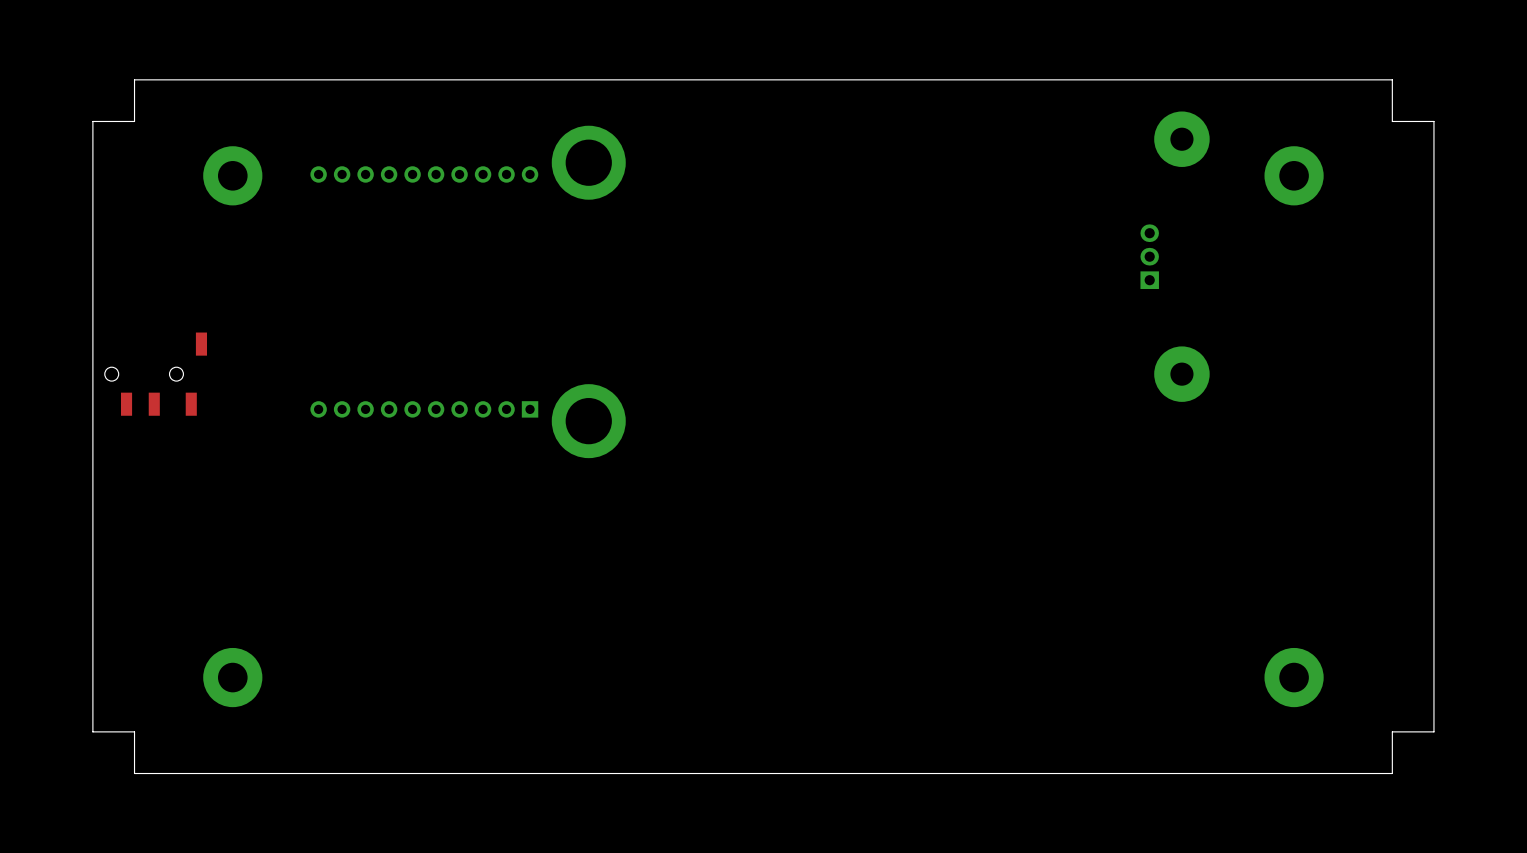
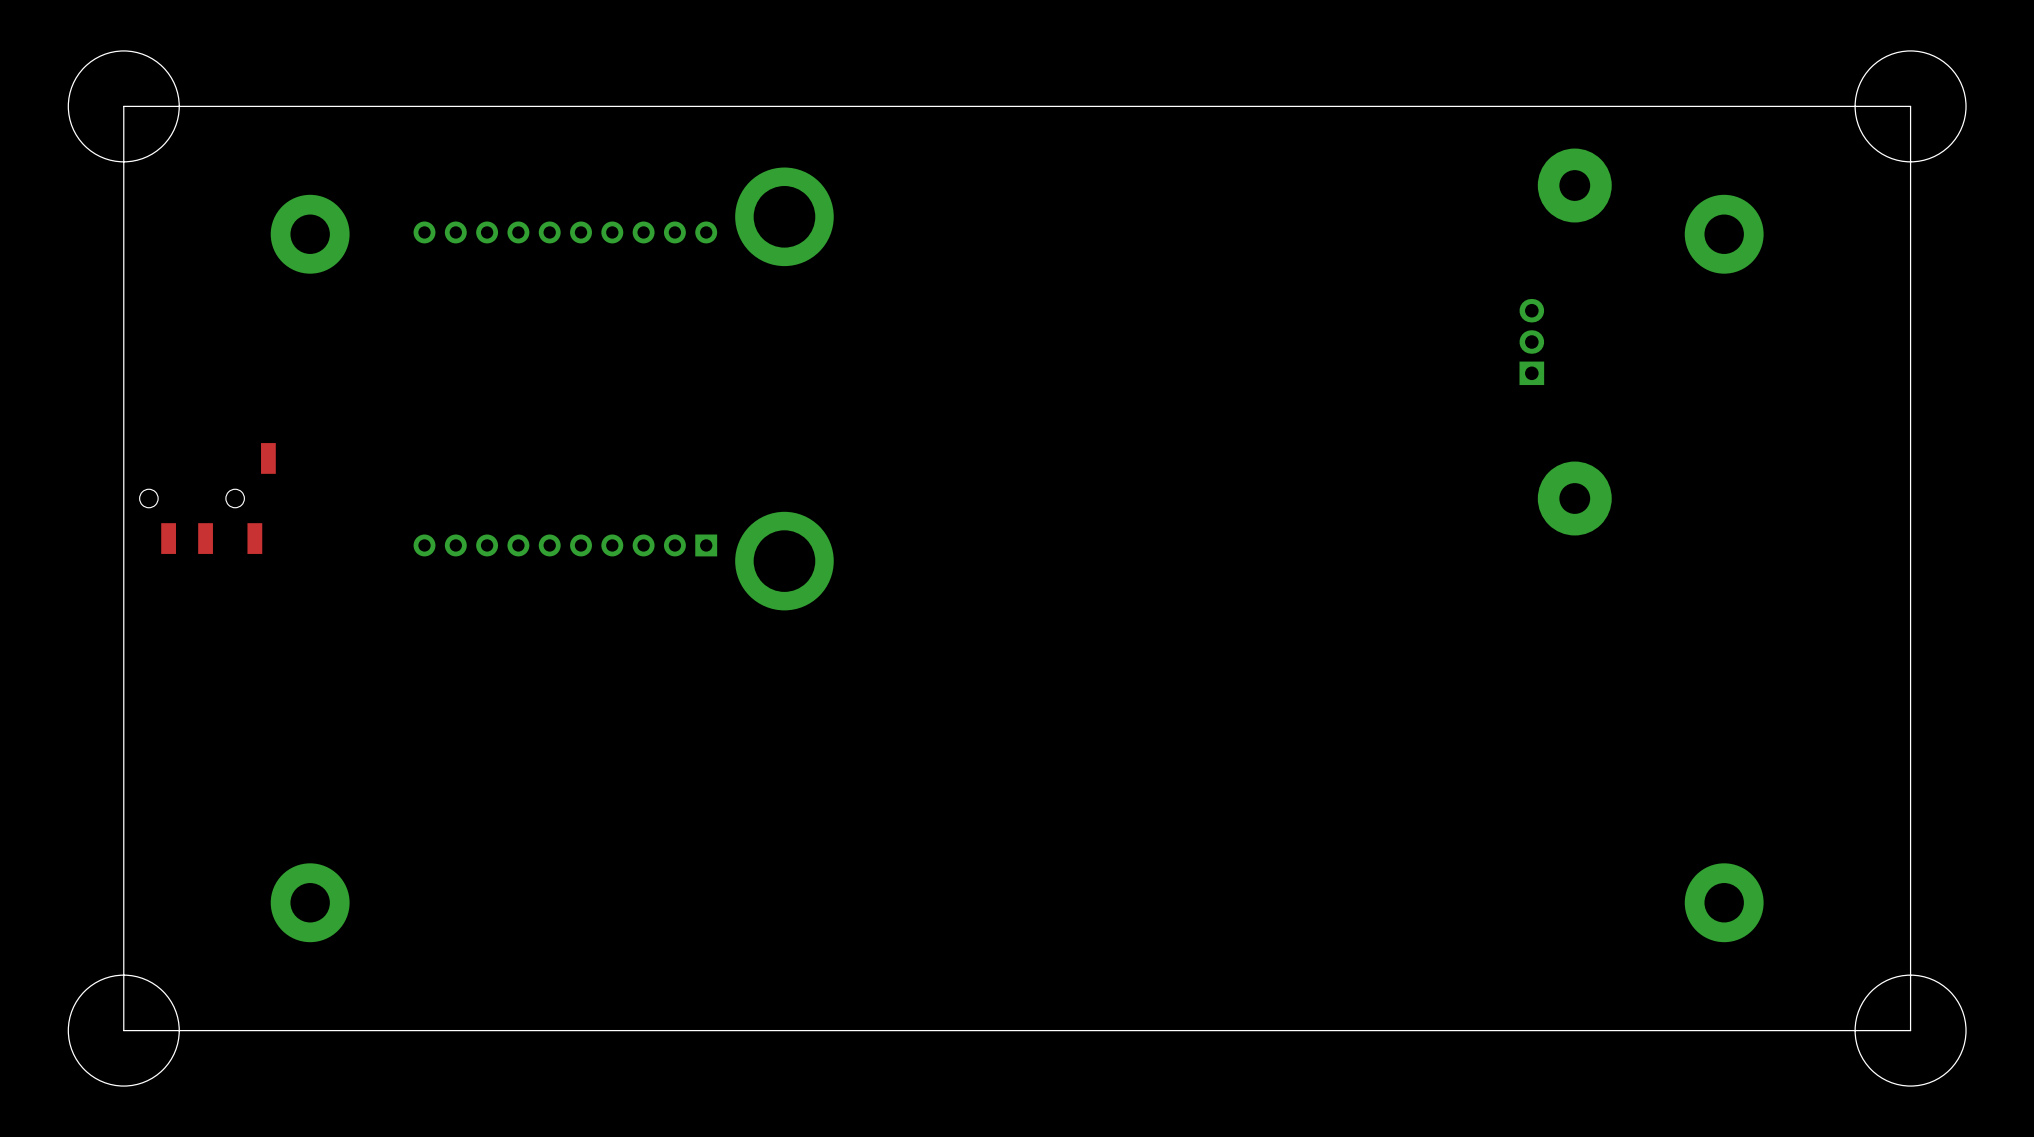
round board edge: none -> [67, 50, 180, 163]
round board edge: none -> [1854, 50, 1967, 163]
board edge: (134, 79) (134, 121) (92, 121) -> (179, 106) (123, 106) (123, 161)
board edge: (1392, 79) (1392, 121) (1433, 121) -> (1855, 106) (1910, 106) (1910, 161)
round board edge: none -> [67, 974, 180, 1087]
board edge: (92, 731) (134, 731) (134, 773) -> (123, 975) (123, 1030) (179, 1030)
round board edge: none -> [1854, 974, 1967, 1087]
board edge: (1433, 731) (1392, 731) (1392, 773) -> (1910, 975) (1910, 1030) (1855, 1030)

